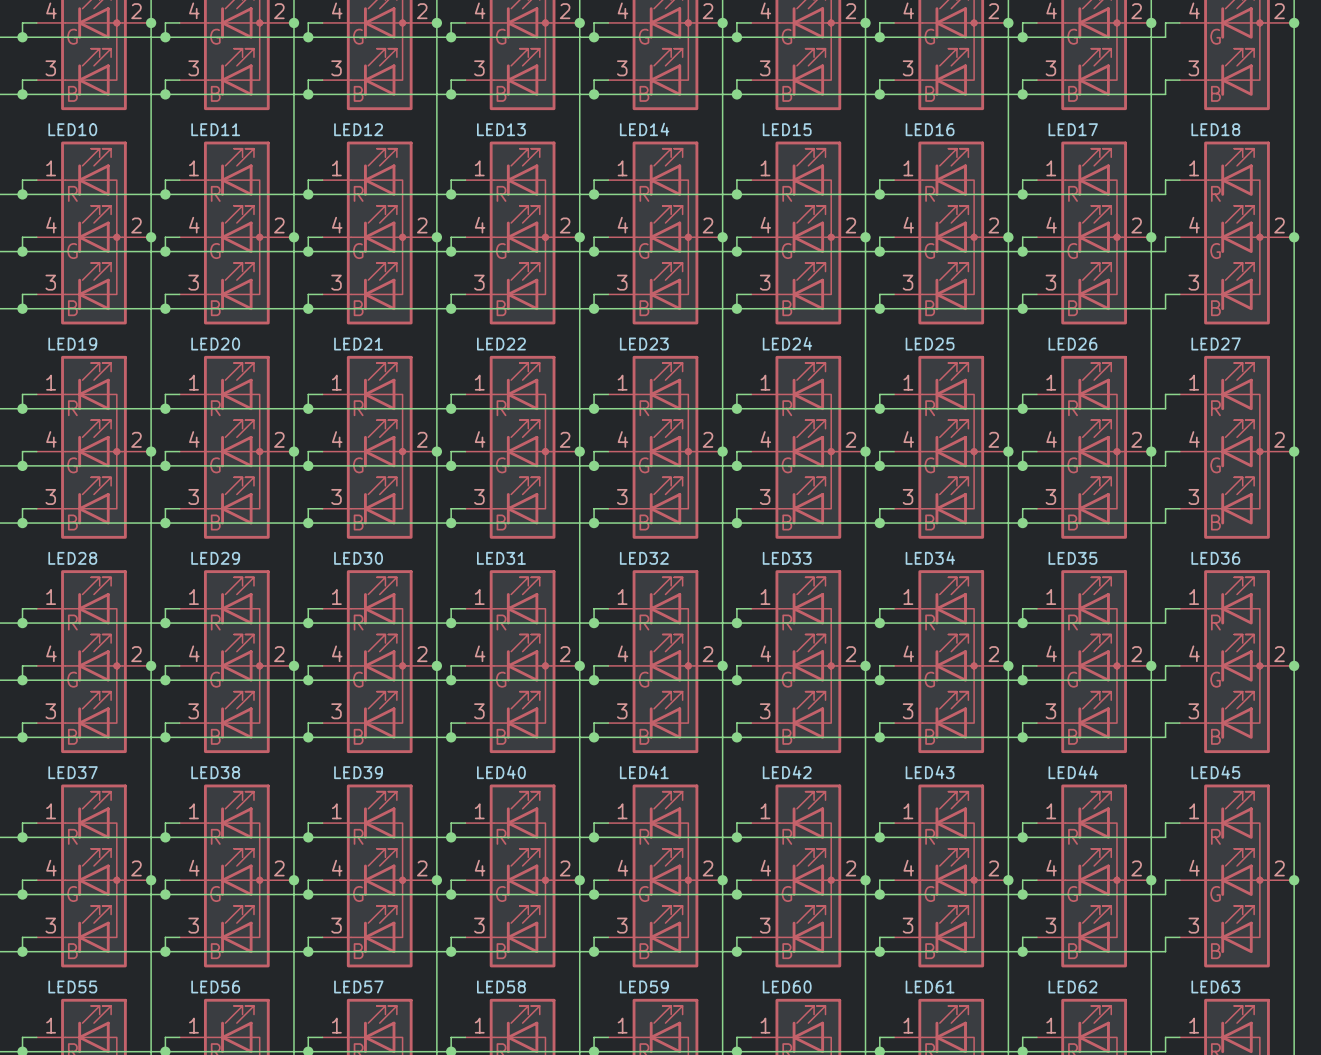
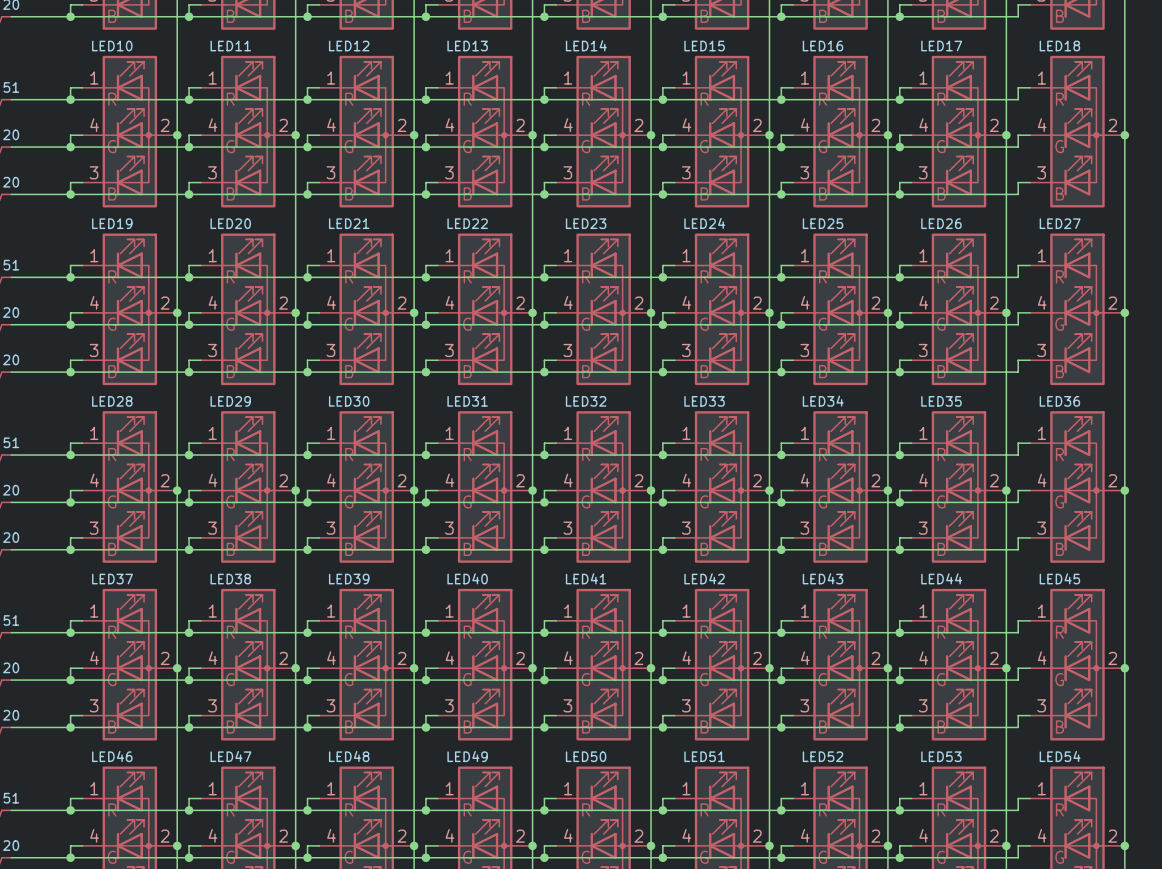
LED55 name: LED55 (72, 986) -> LED46 (112, 756)
LED56 name: LED56 (215, 986) -> LED47 (230, 756)
LED57 name: LED57 (358, 986) -> LED48 (349, 756)
LED58 name: LED58 (501, 986) -> LED49 (467, 756)
LED59 name: LED59 (644, 986) -> LED50 (586, 756)
LED60 name: LED60 (787, 986) -> LED51 (704, 756)
LED61 name: LED61 (930, 986) -> LED52 (823, 756)
LED62 name: LED62 (1072, 986) -> LED53 (941, 756)
LED63 name: LED63 (1215, 986) -> LED54 (1060, 756)

